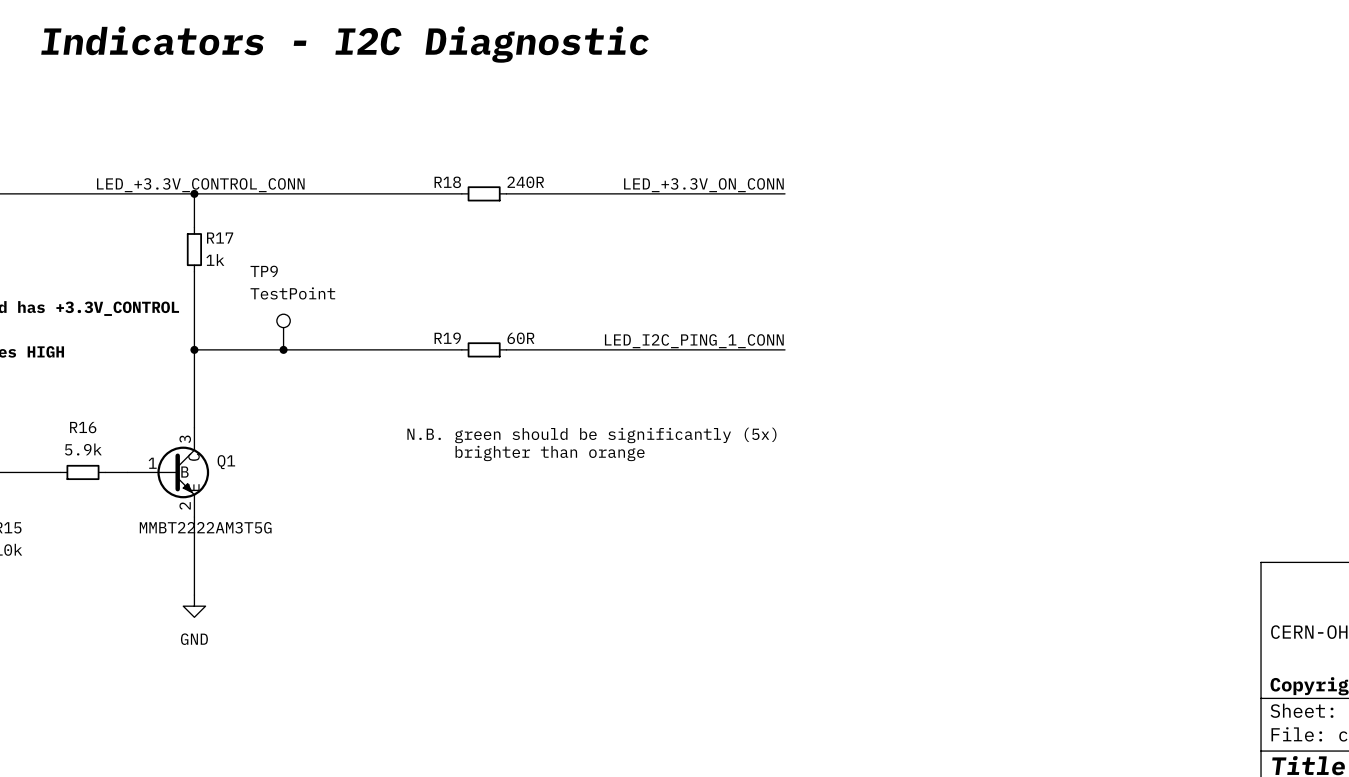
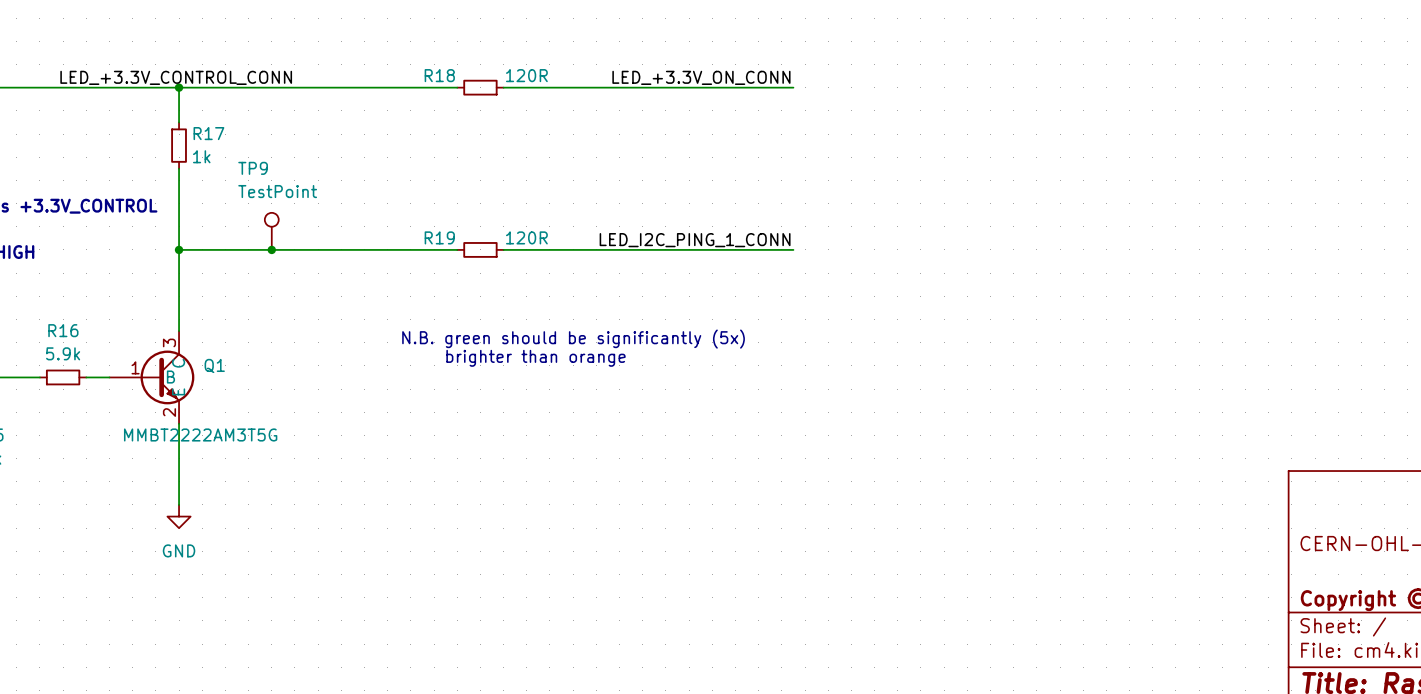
R18 value: 240R (525, 182) -> 120R (526, 75)
R19 value: 60R (520, 338) -> 120R (526, 237)

